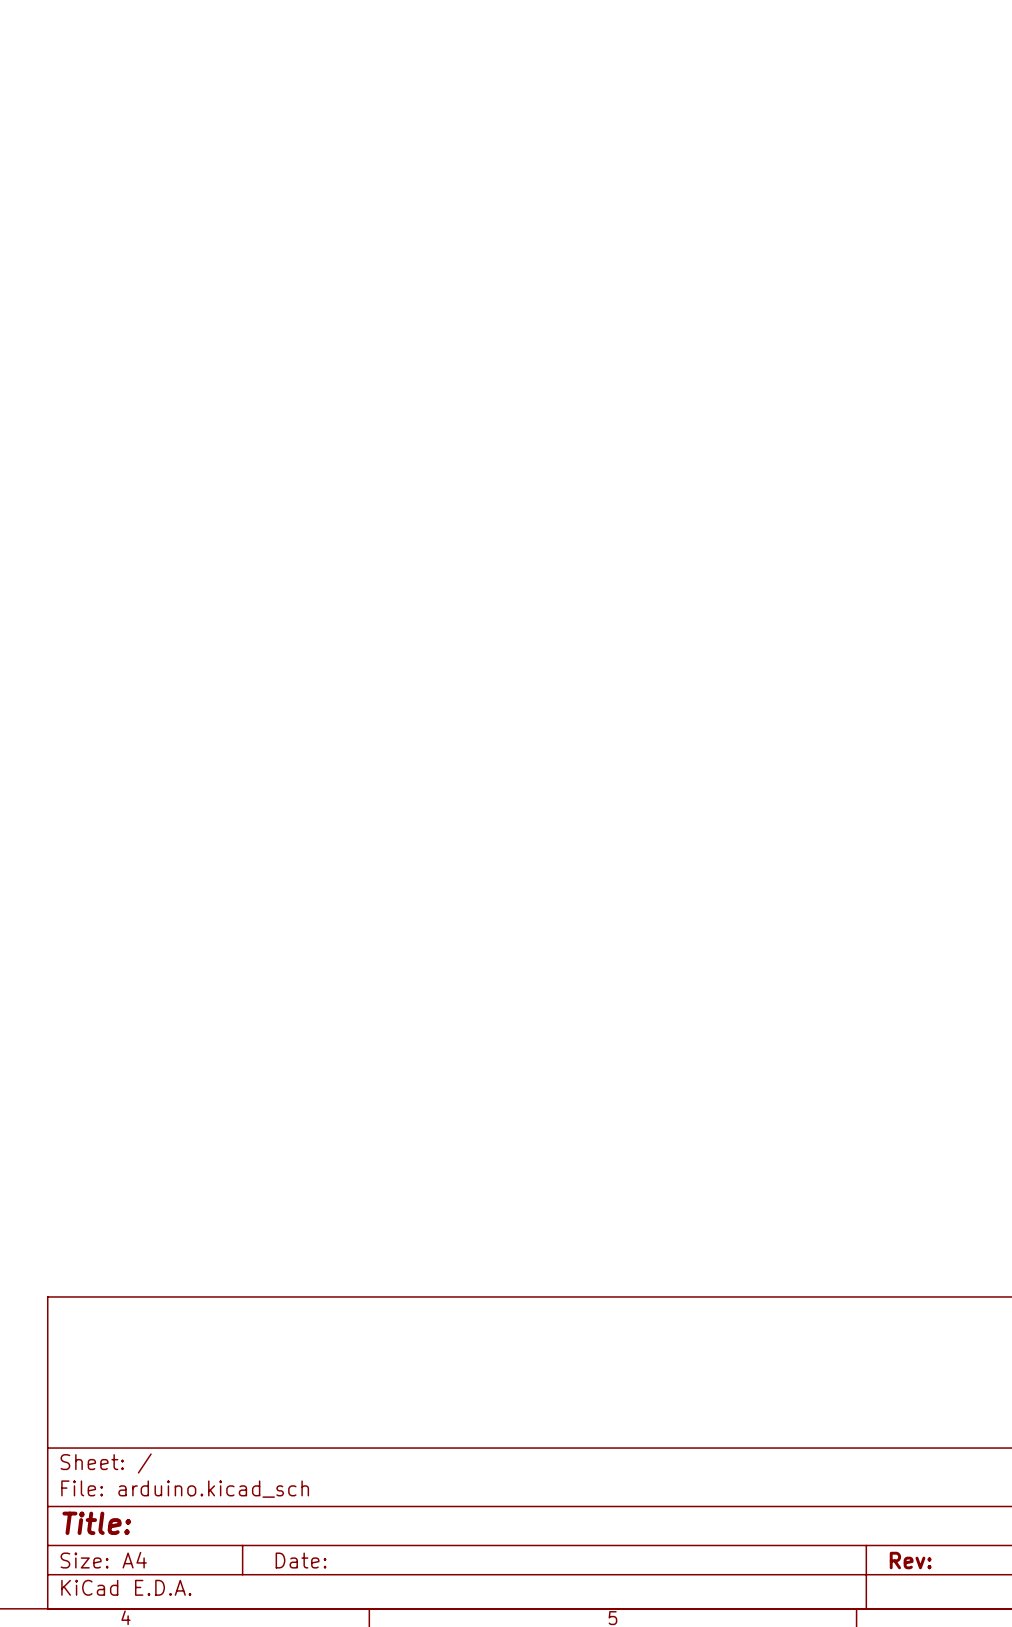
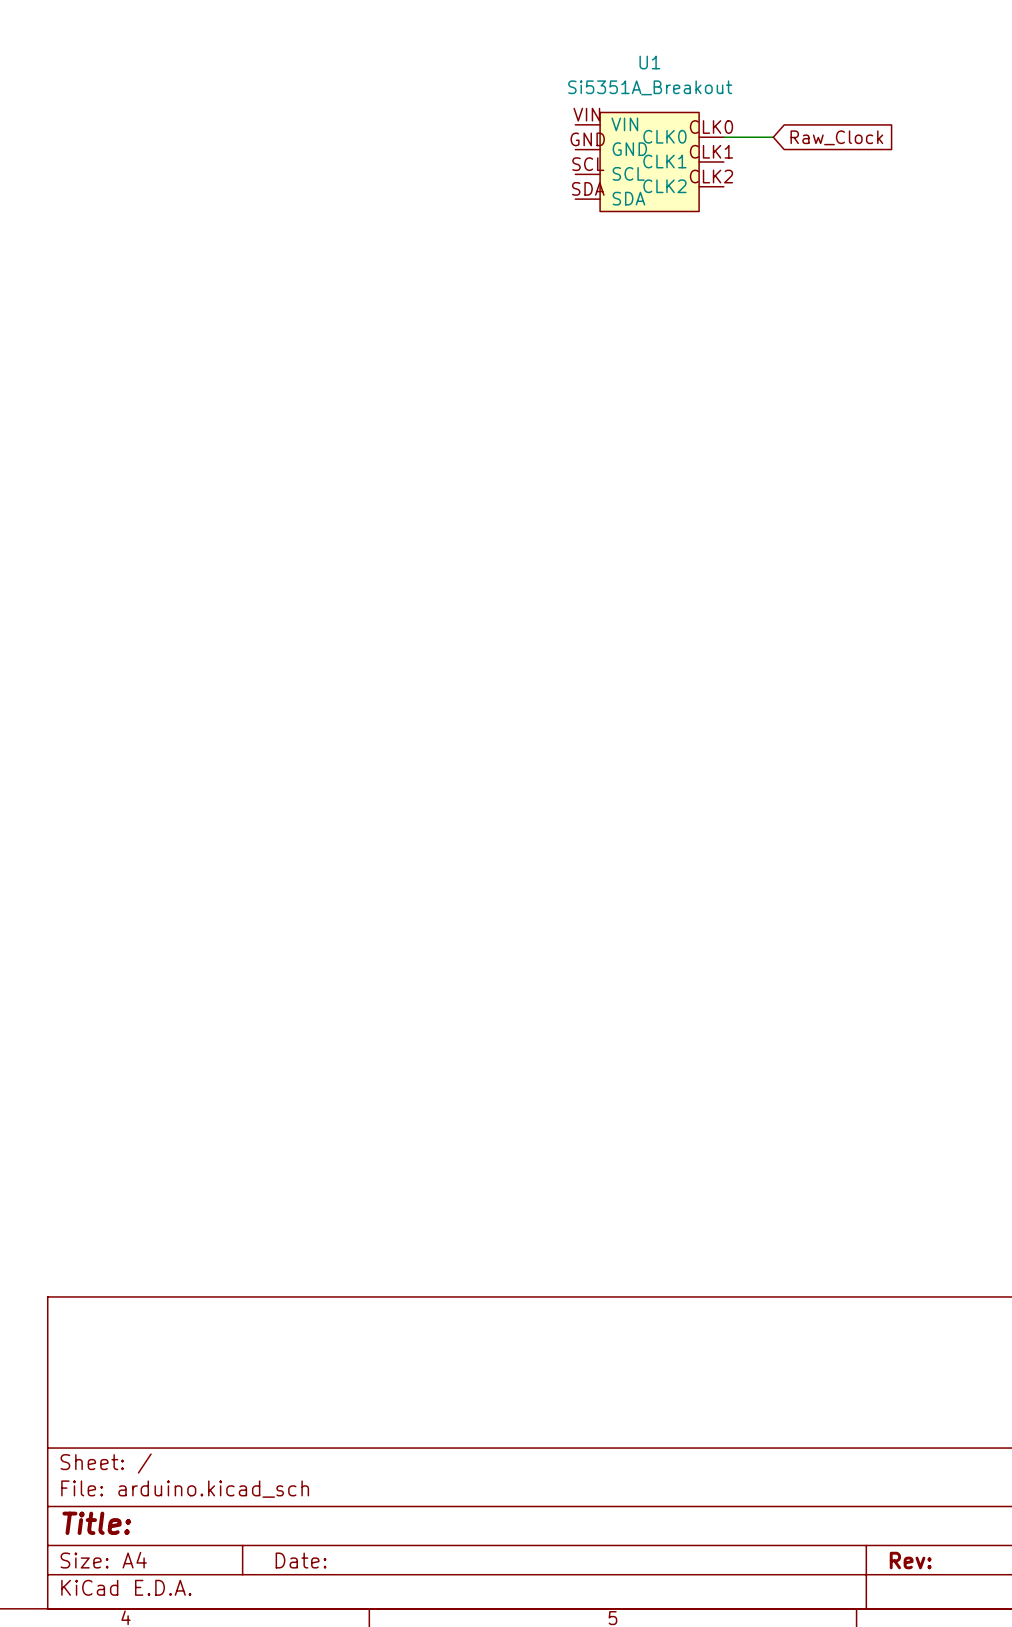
wire: none -> (723, 137) (773, 137)
global label: none -> Raw_Clock (836, 137)
U1: none -> Si5351A_Breakout (649, 161)

